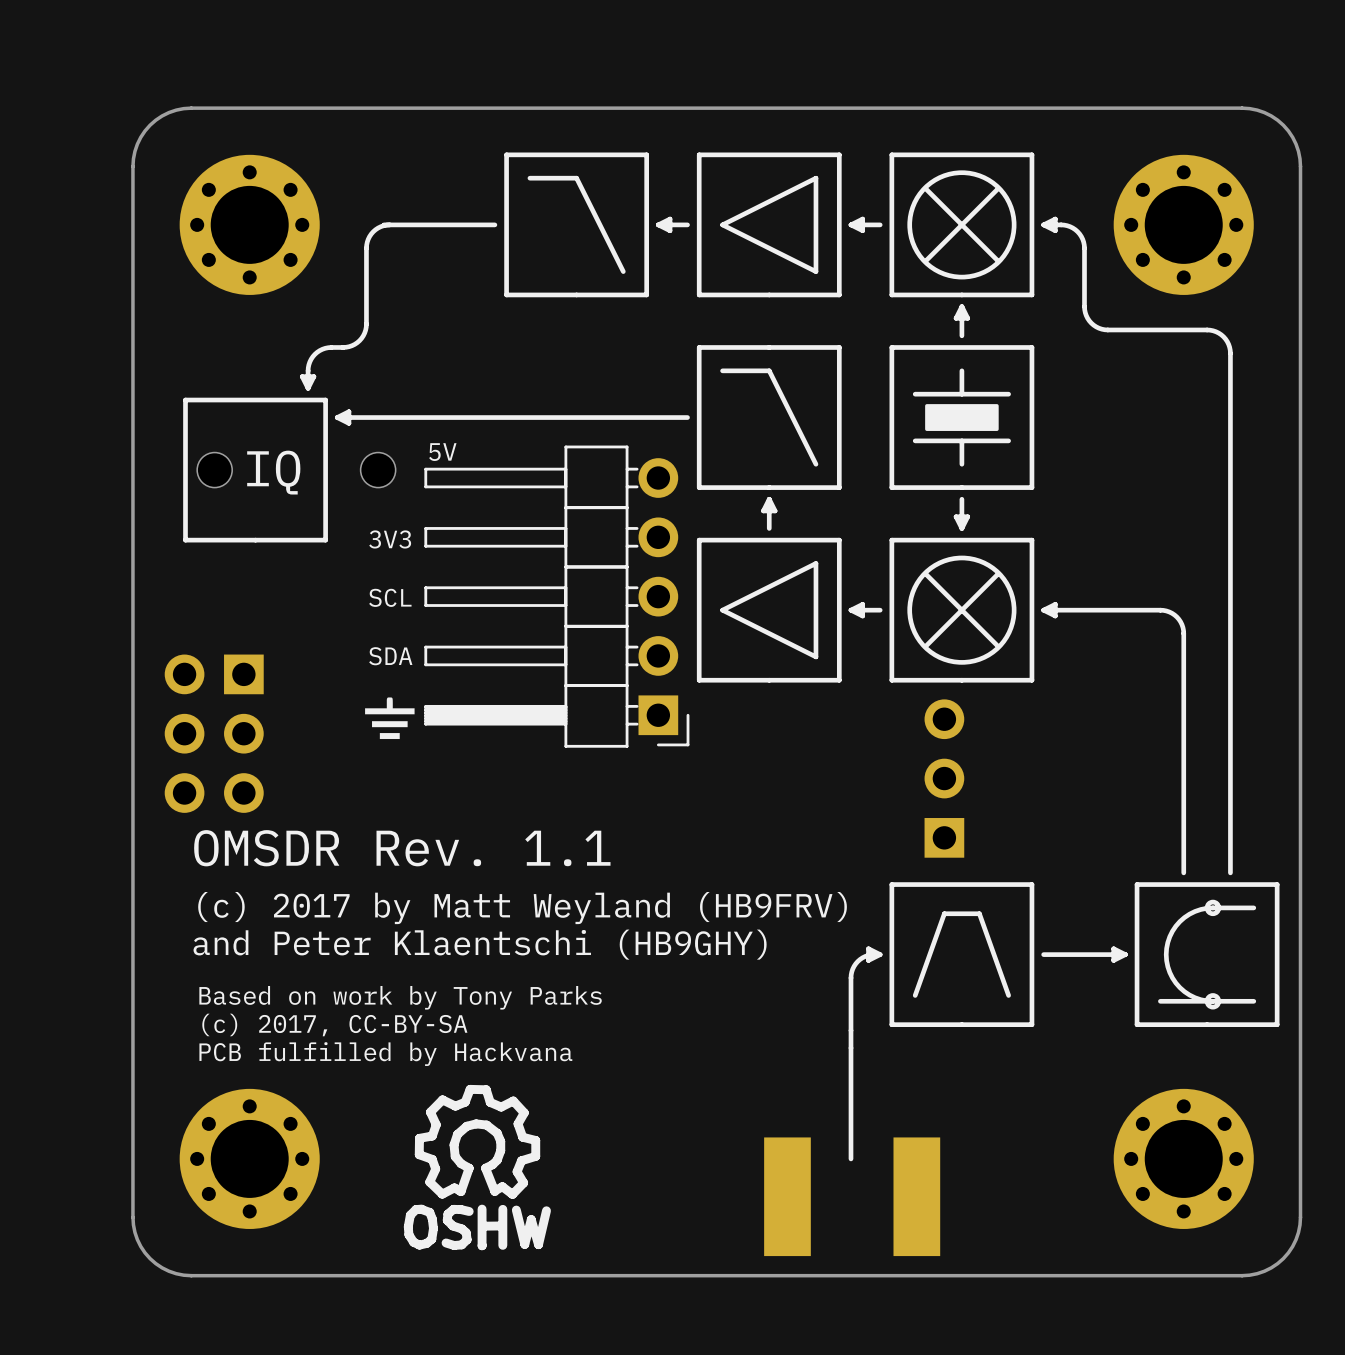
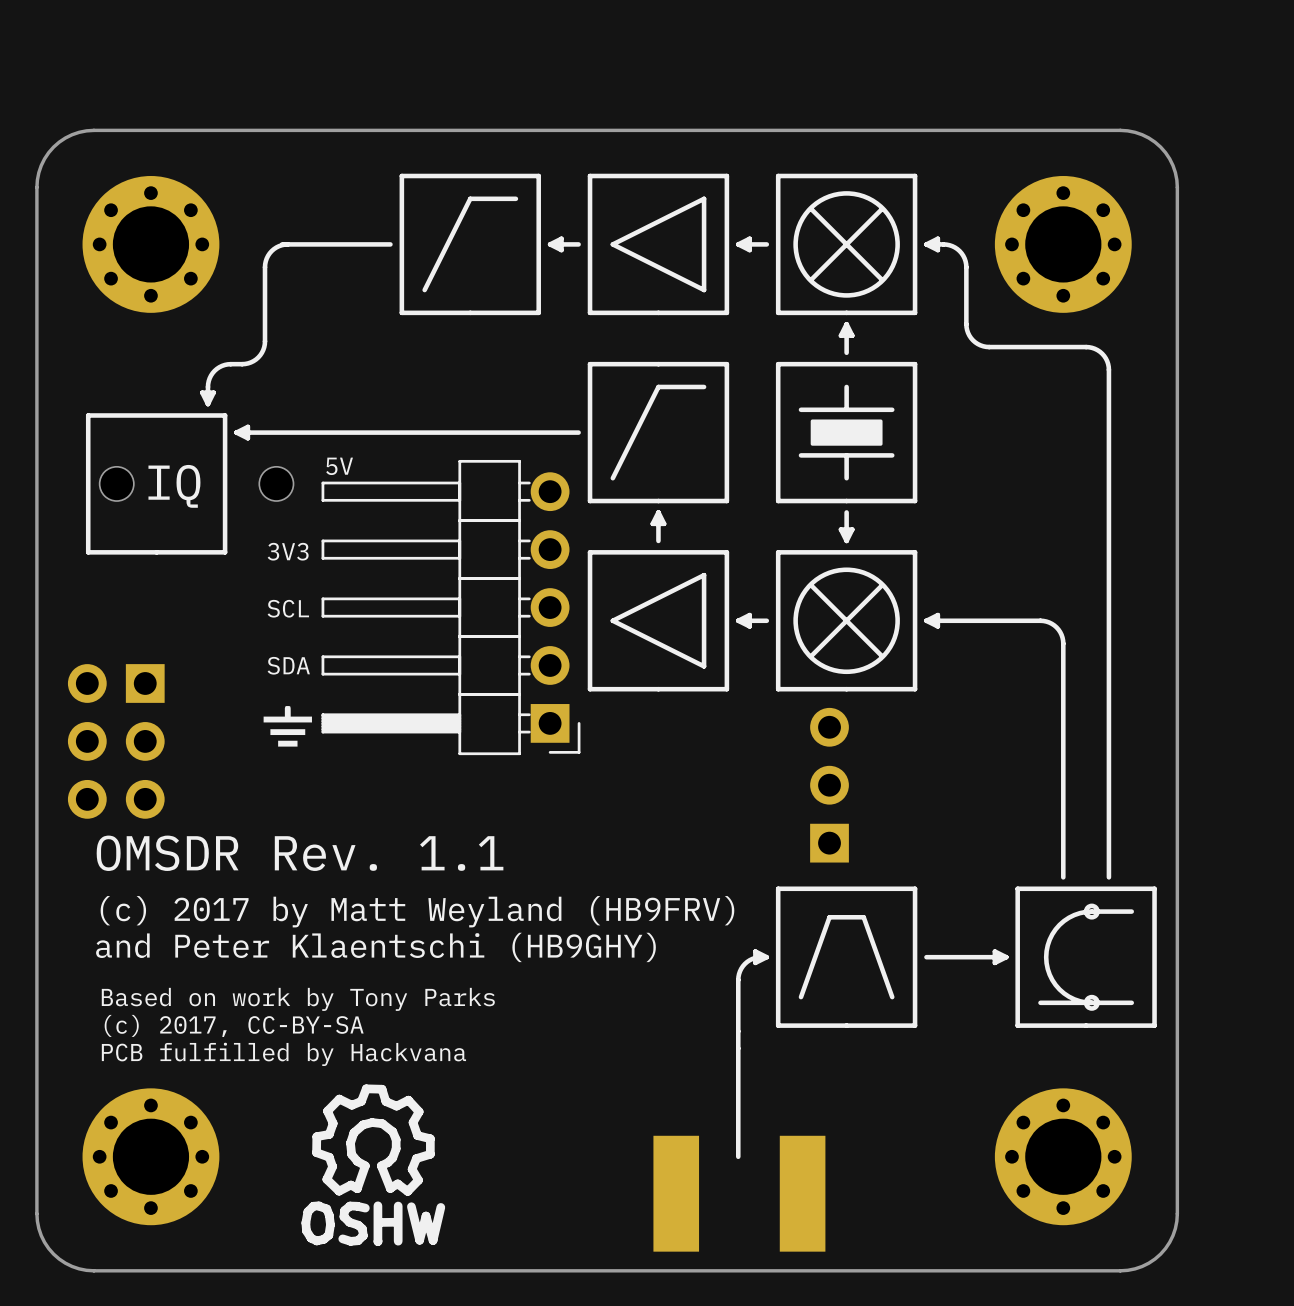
line: (529, 178) (576, 178) (623, 271) -> none
line: none -> (515, 198) (470, 198) (424, 290)
line: (722, 370) (769, 370) (815, 464) -> none
line: none -> (704, 386) (658, 386) (612, 478)

